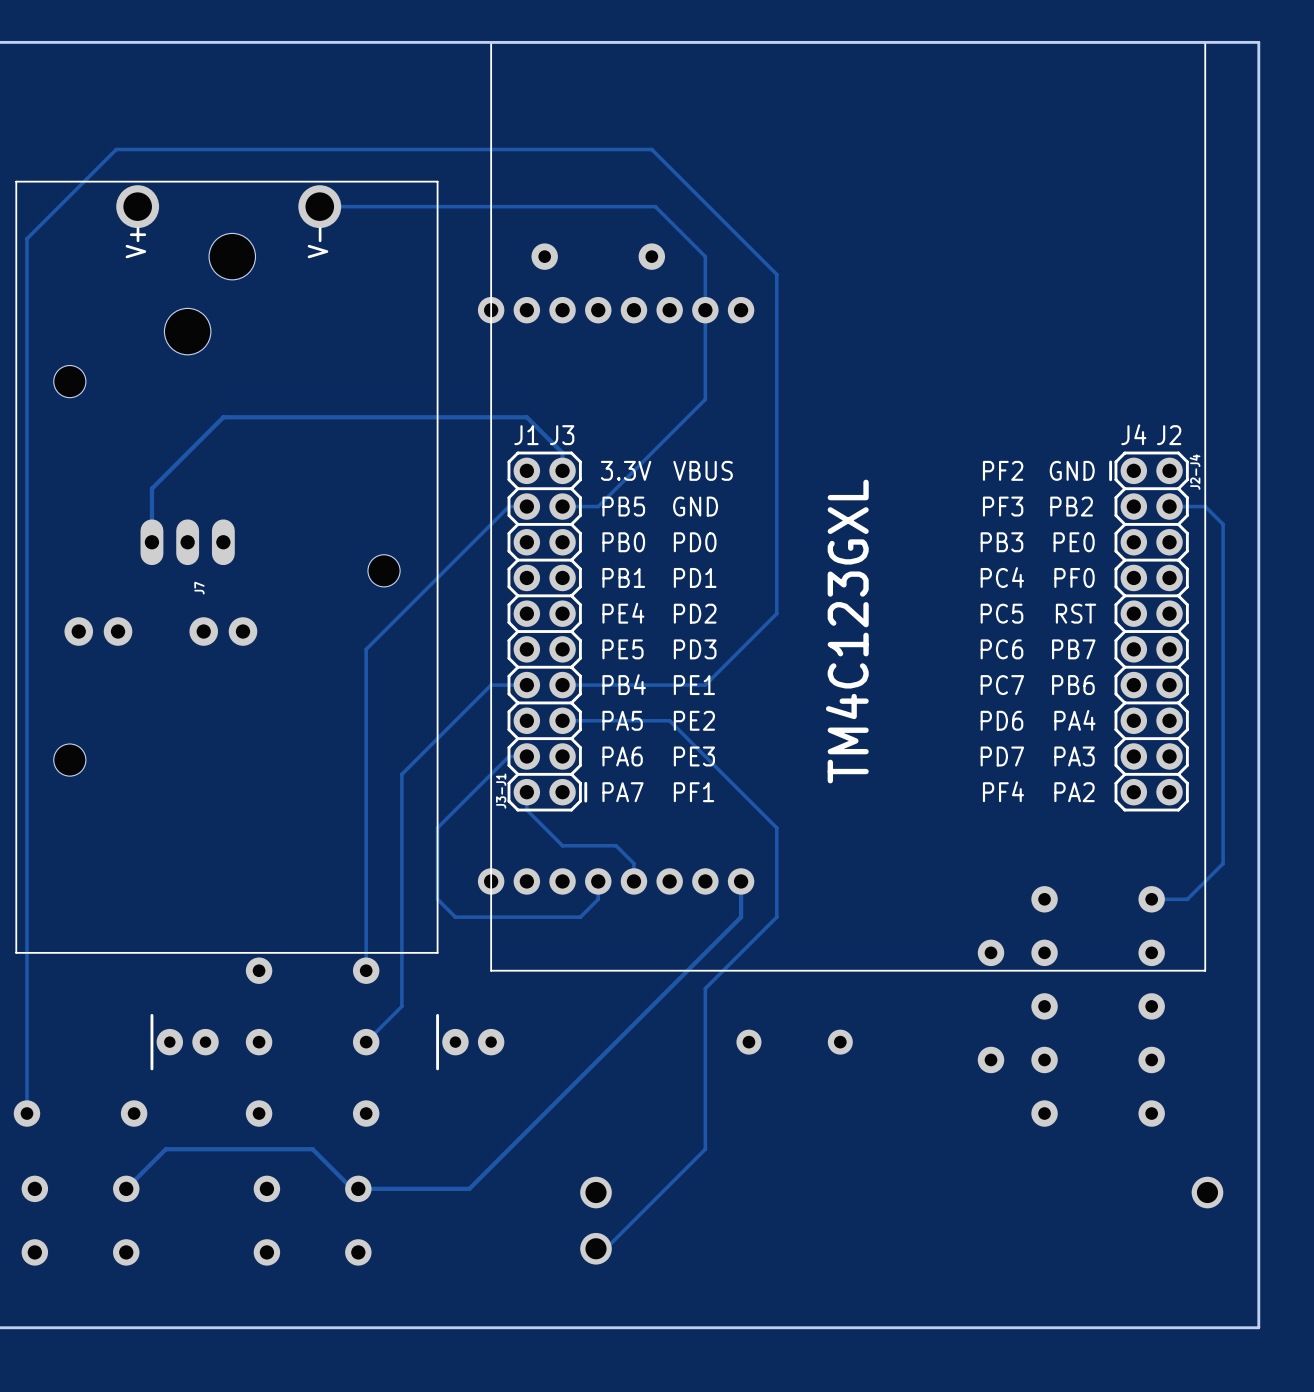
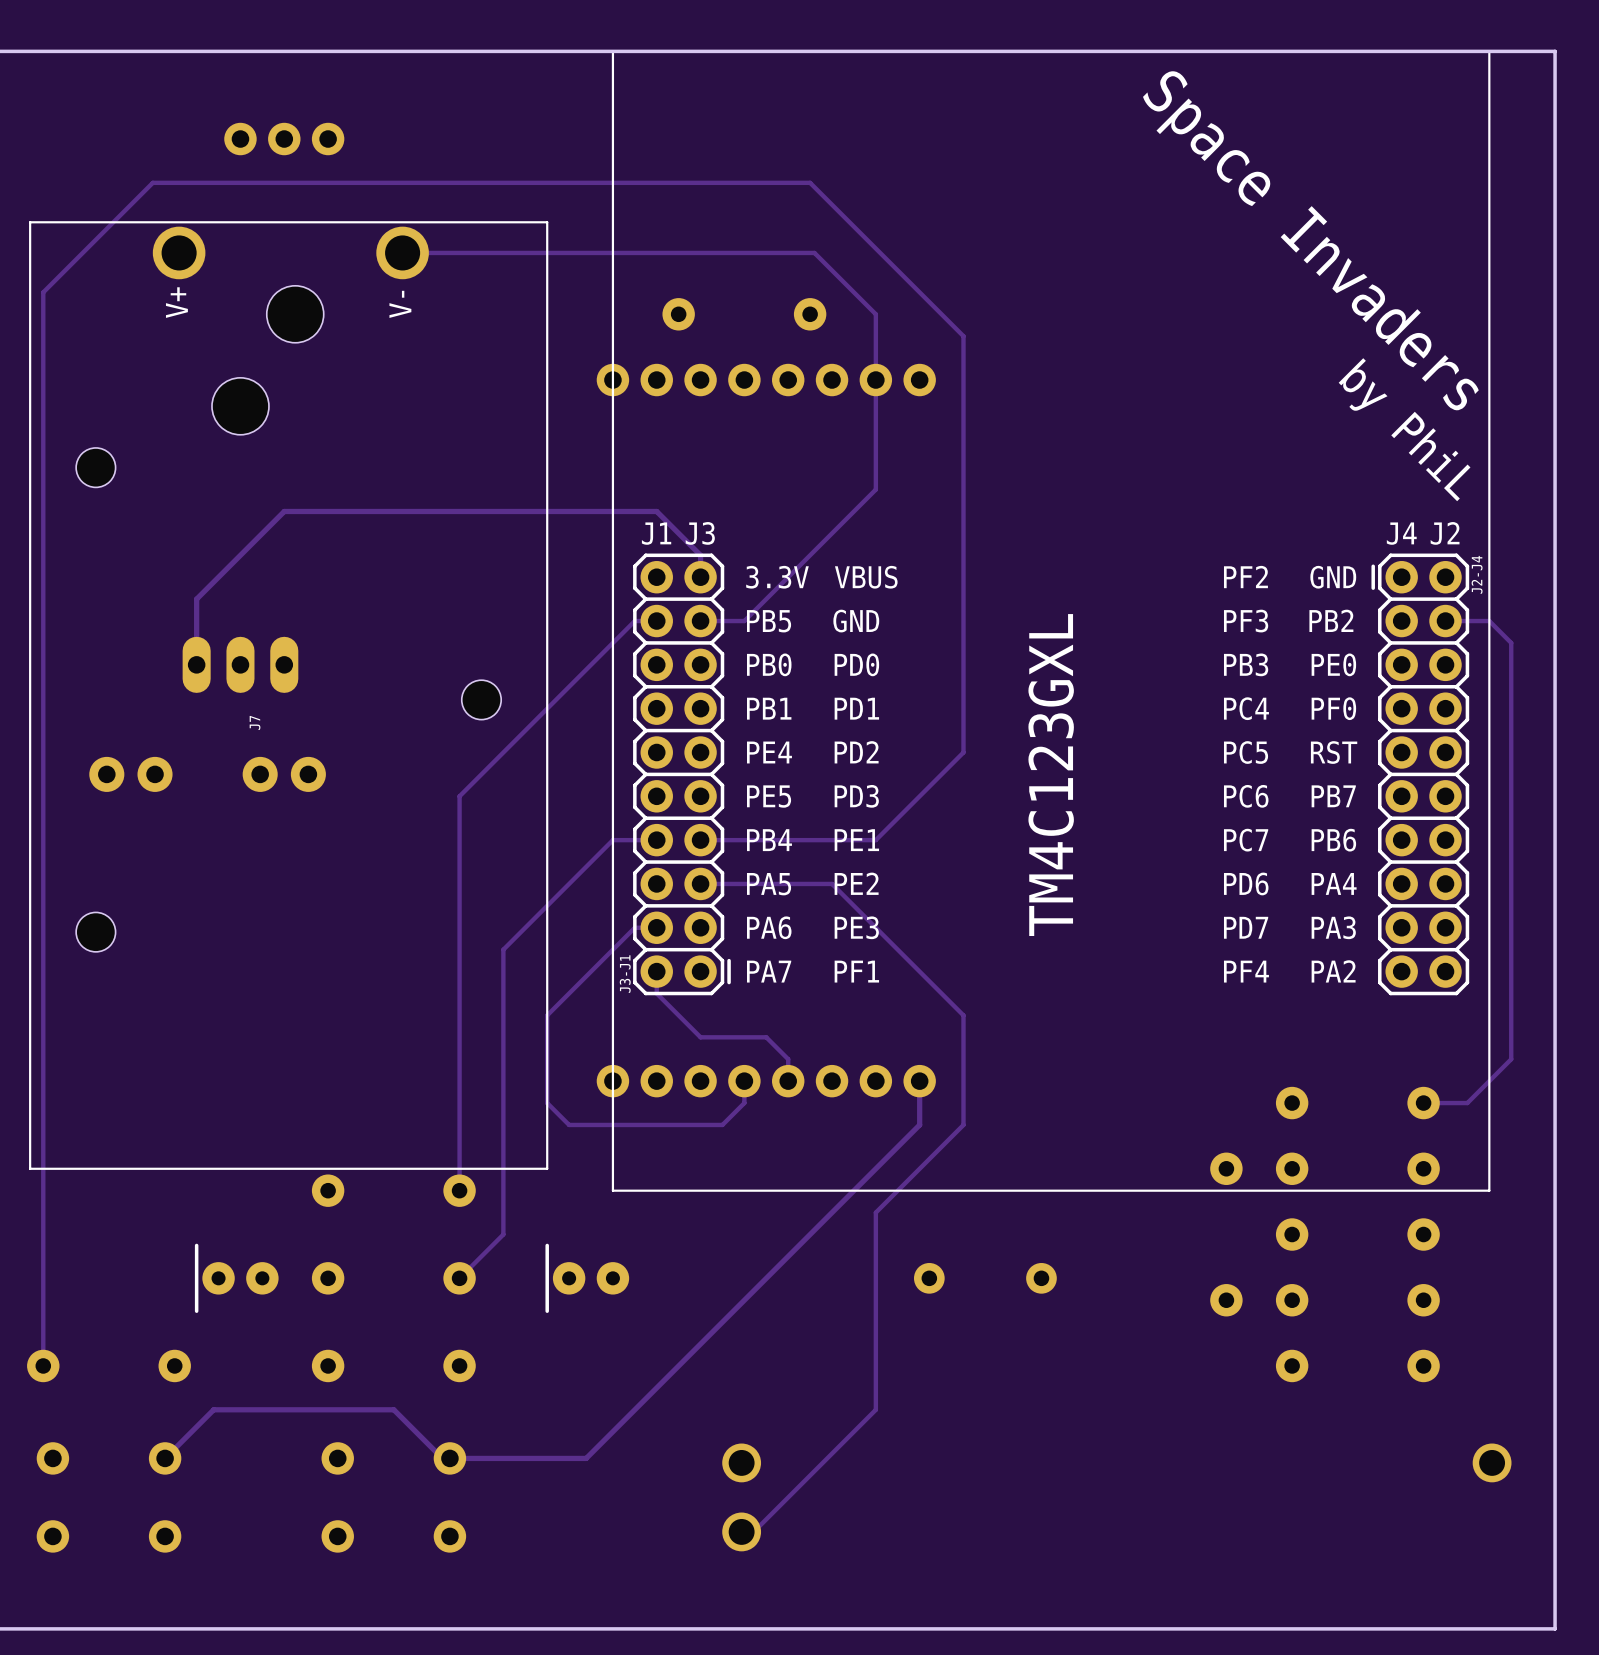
part: none -> (284, 139)
text: none -> Space Invaders (1310, 240)
text: none -> by PhiL (1404, 429)

